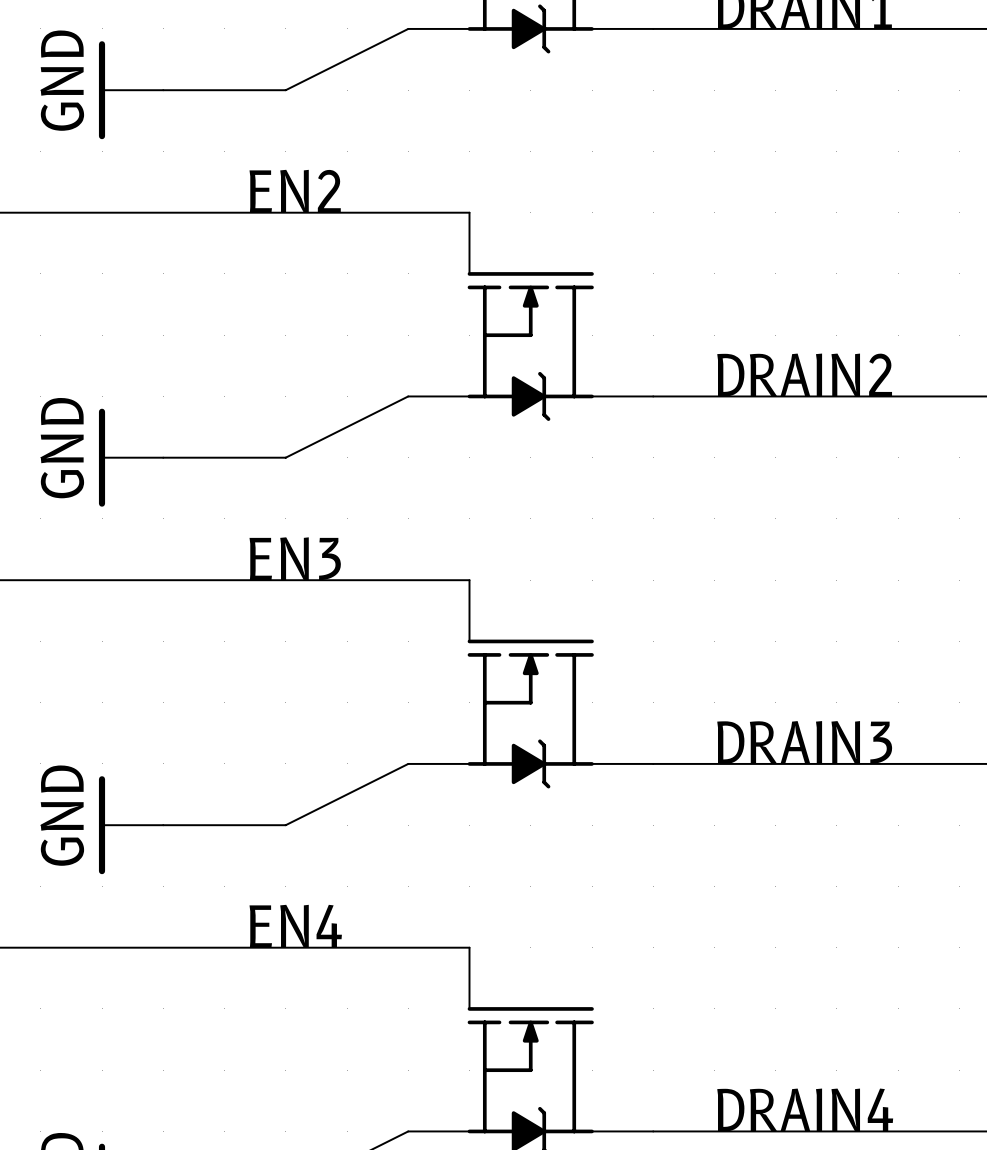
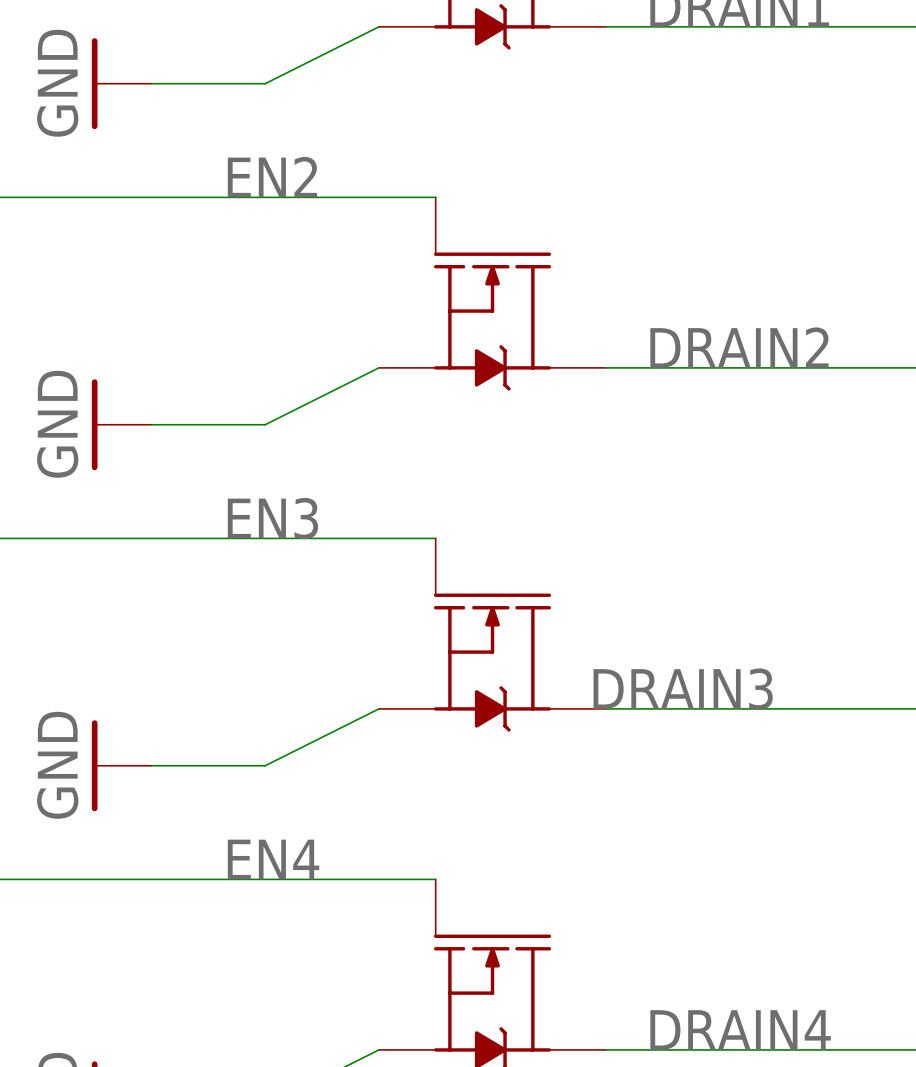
label position: DRAIN3 (804, 742) -> DRAIN3 (683, 689)

